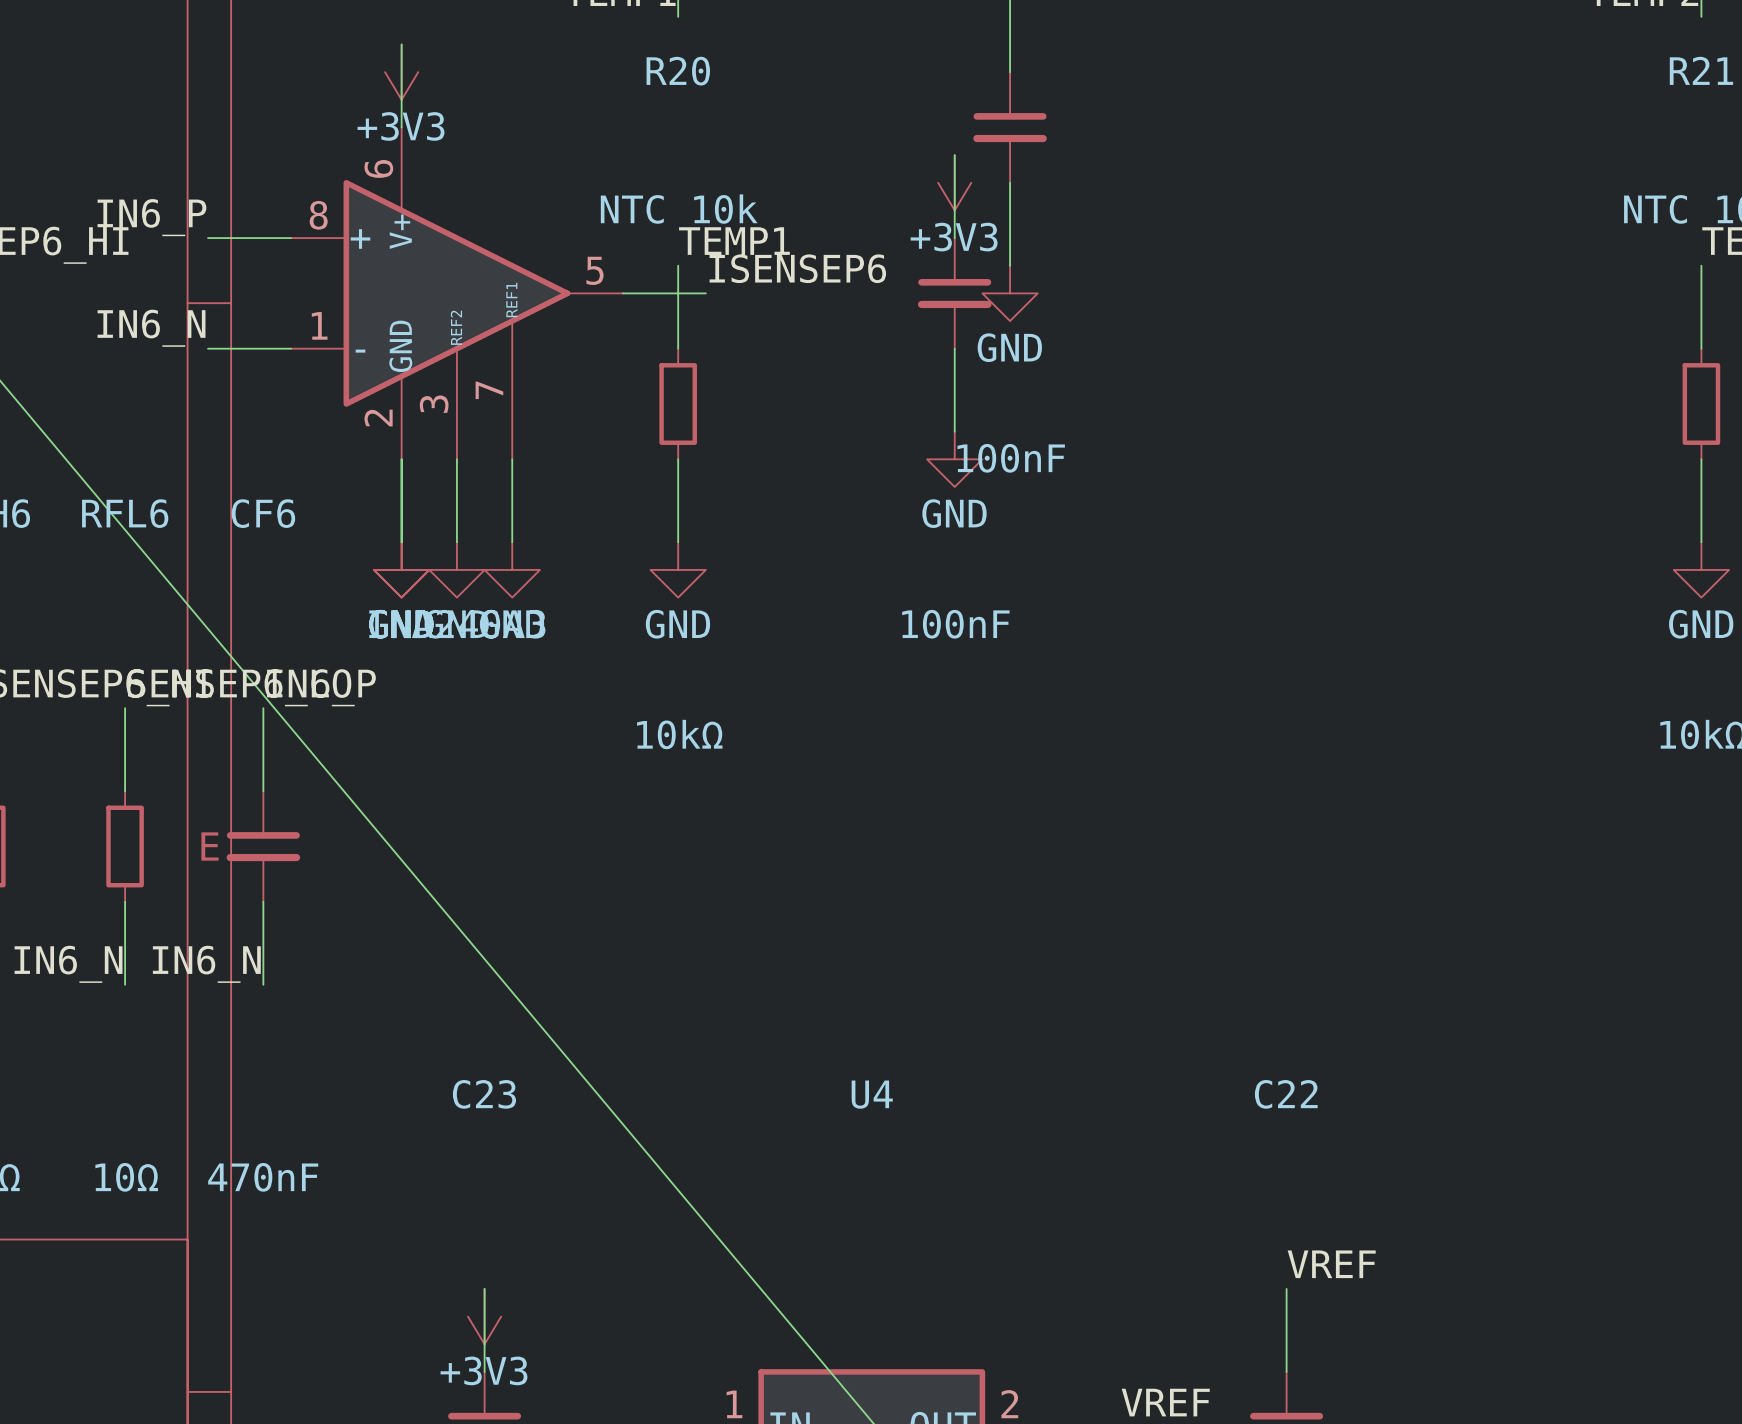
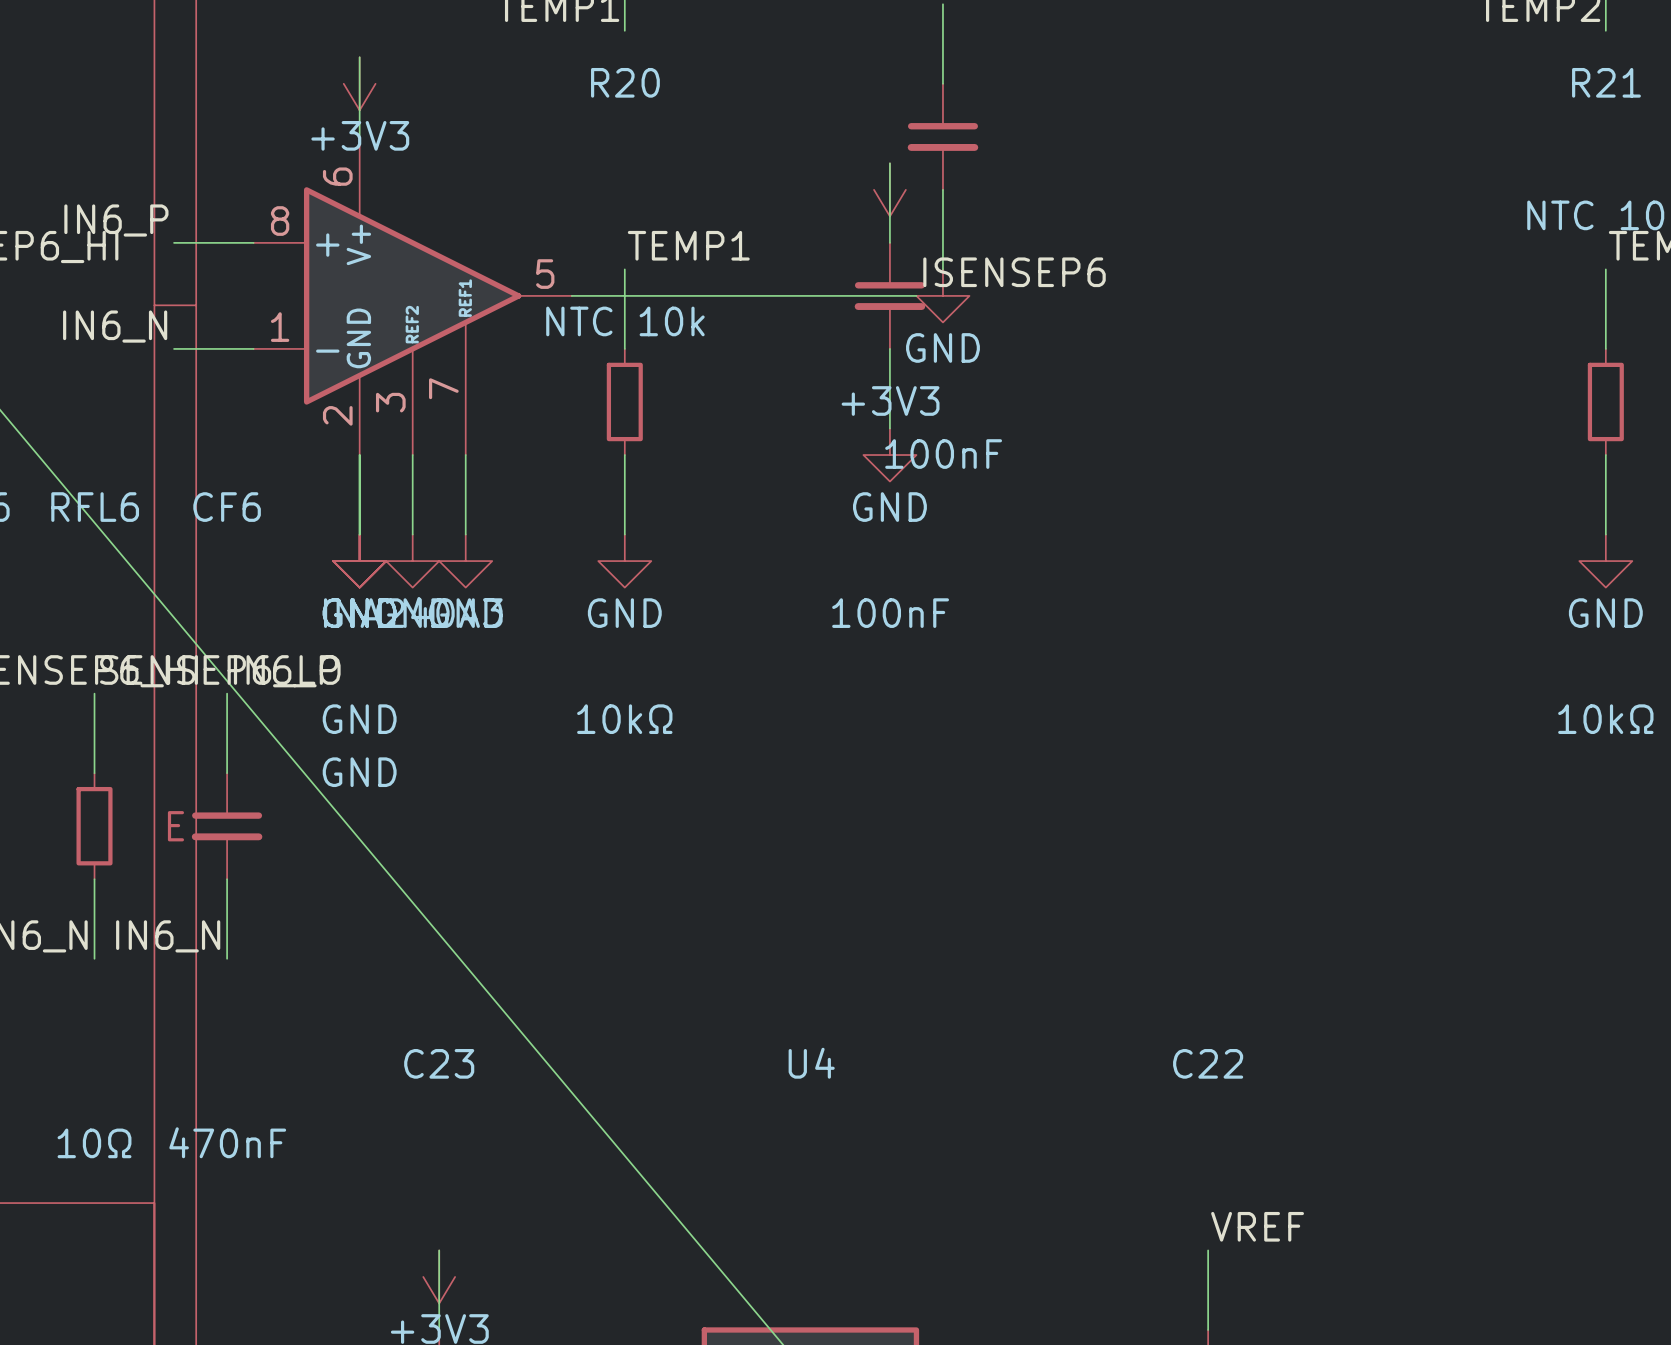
part value position: NTC 10k (679, 209) -> NTC 10k (625, 321)
power symbol text position: +3V3 (954, 237) -> +3V3 (890, 400)
label position: ISENSEP6 (797, 268) -> ISENSEP6 (1014, 272)
wire: none -> (651, 295) (916, 295)
power symbol: none -> GND (359, 561)
power symbol: none -> GND (359, 561)

